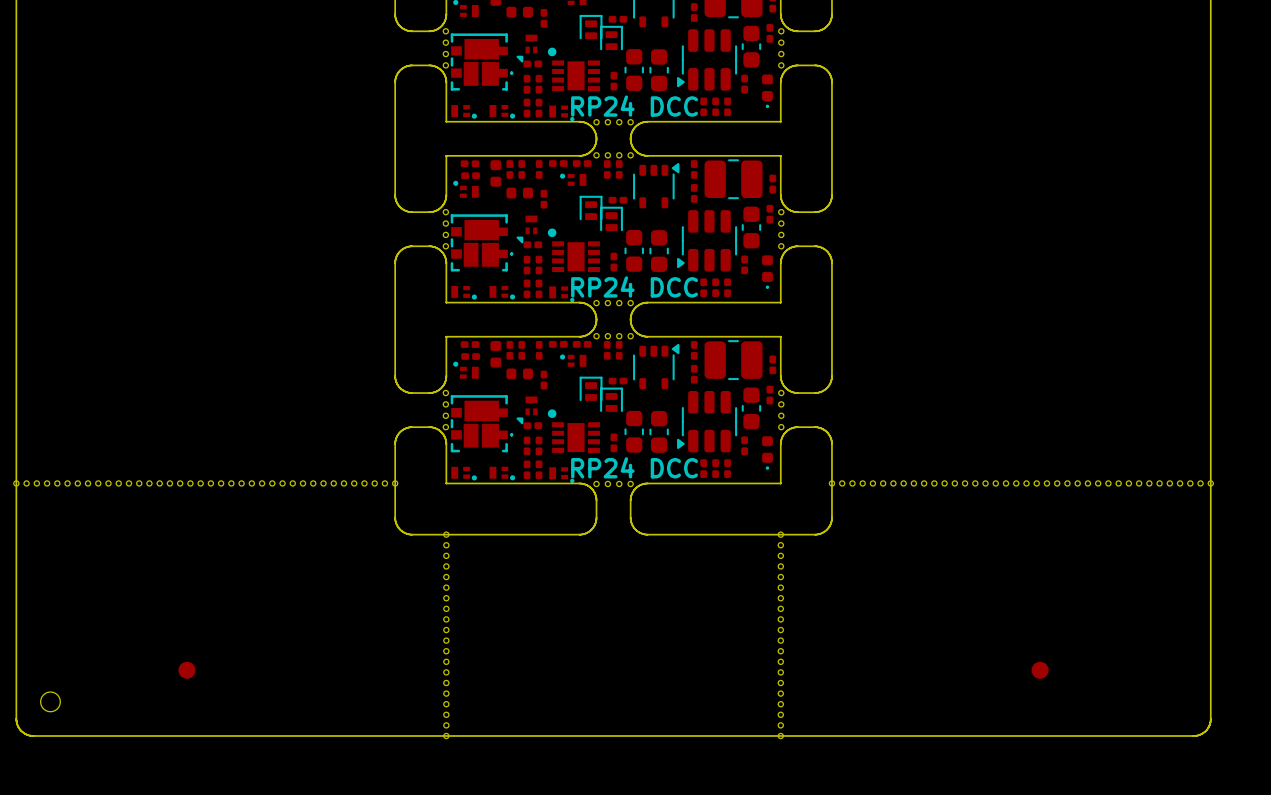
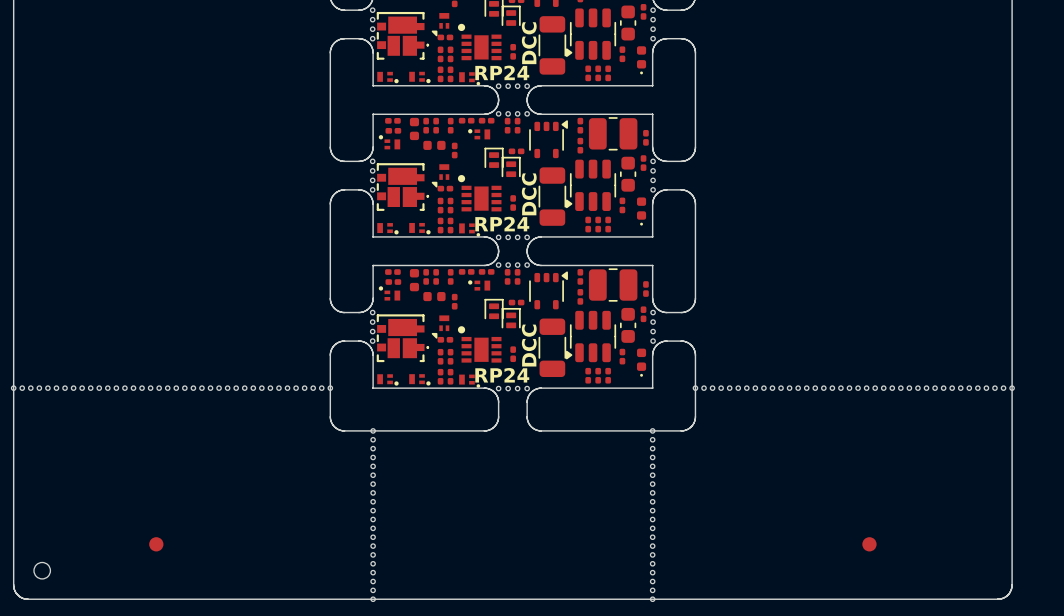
part footprint: [649, 49, 669, 92] -> [538, 16, 567, 75]
text: none -> DCC (529, 43)
part: (634, 70) -> none
text: RP24 DCC (634, 106) -> RP24 (502, 72)
part footprint: [649, 230, 669, 272] -> [538, 167, 567, 226]
text: none -> DCC (529, 194)
part: (634, 250) -> none
text: RP24 DCC (634, 286) -> RP24 (502, 224)
part footprint: [649, 411, 669, 453] -> [538, 318, 567, 378]
text: none -> DCC (529, 345)
part: (634, 431) -> none
text: RP24 DCC (634, 467) -> RP24 (502, 375)

